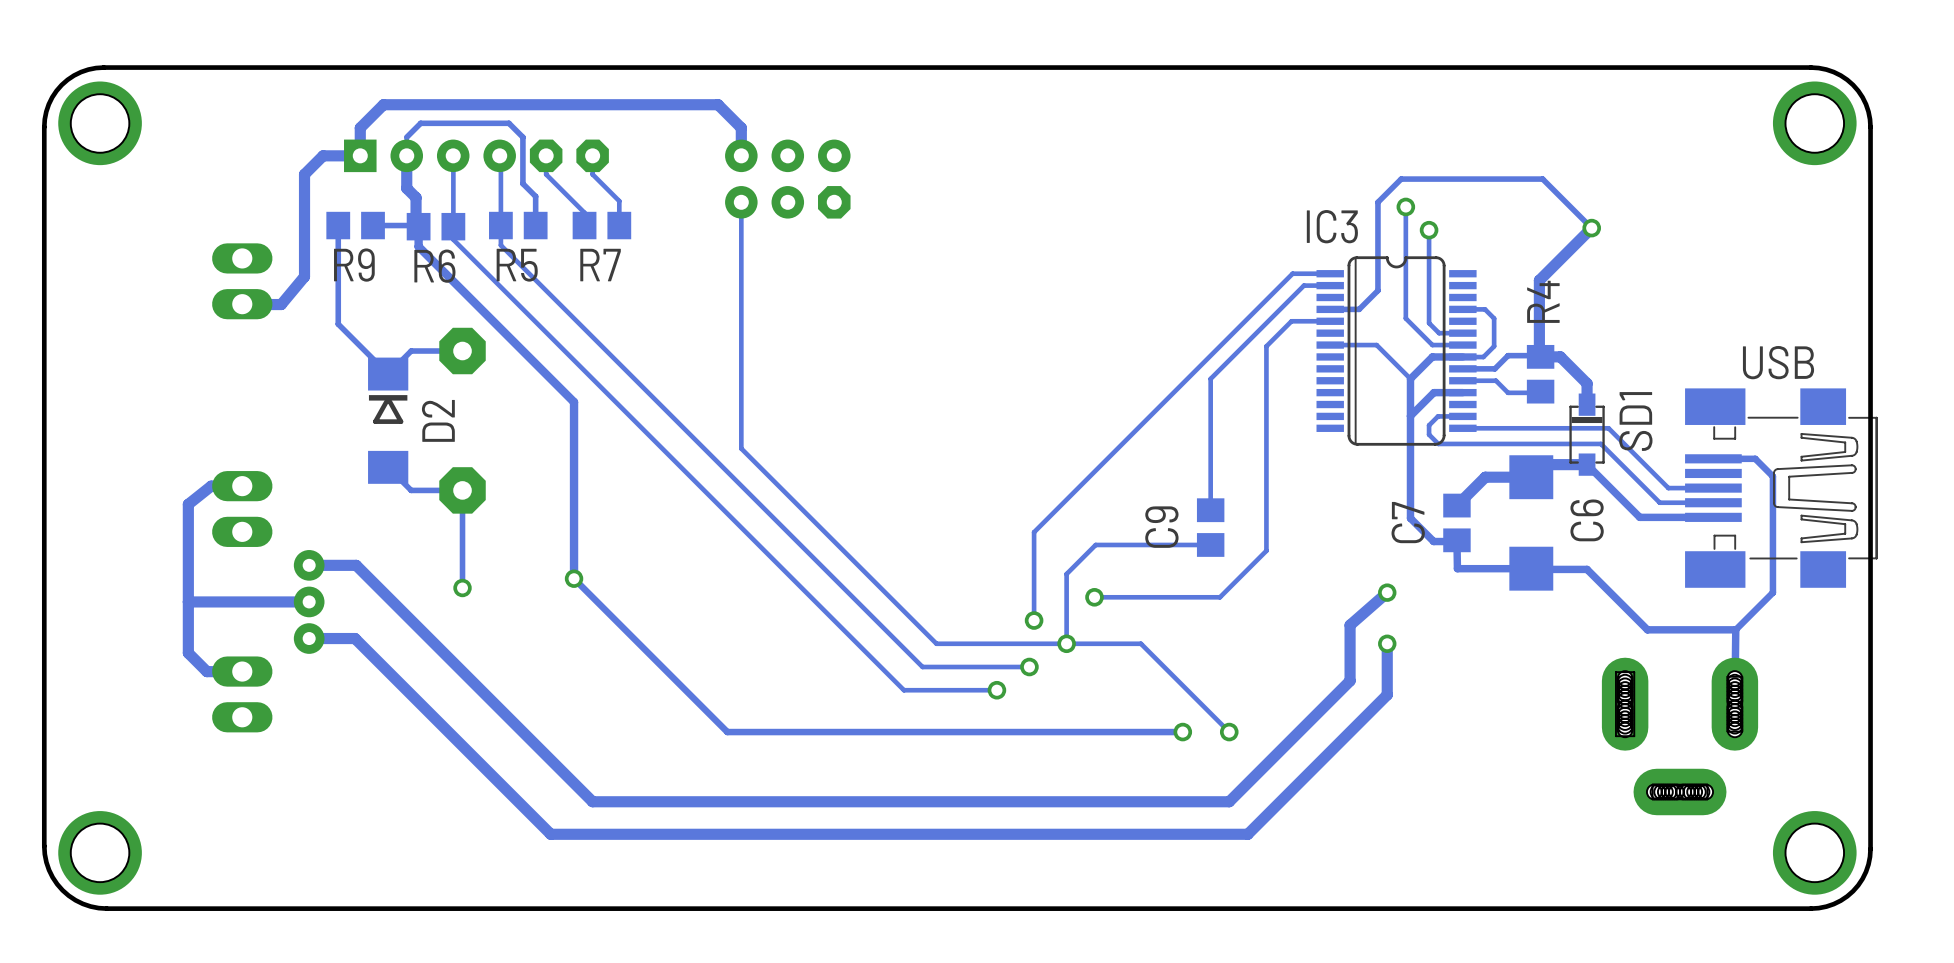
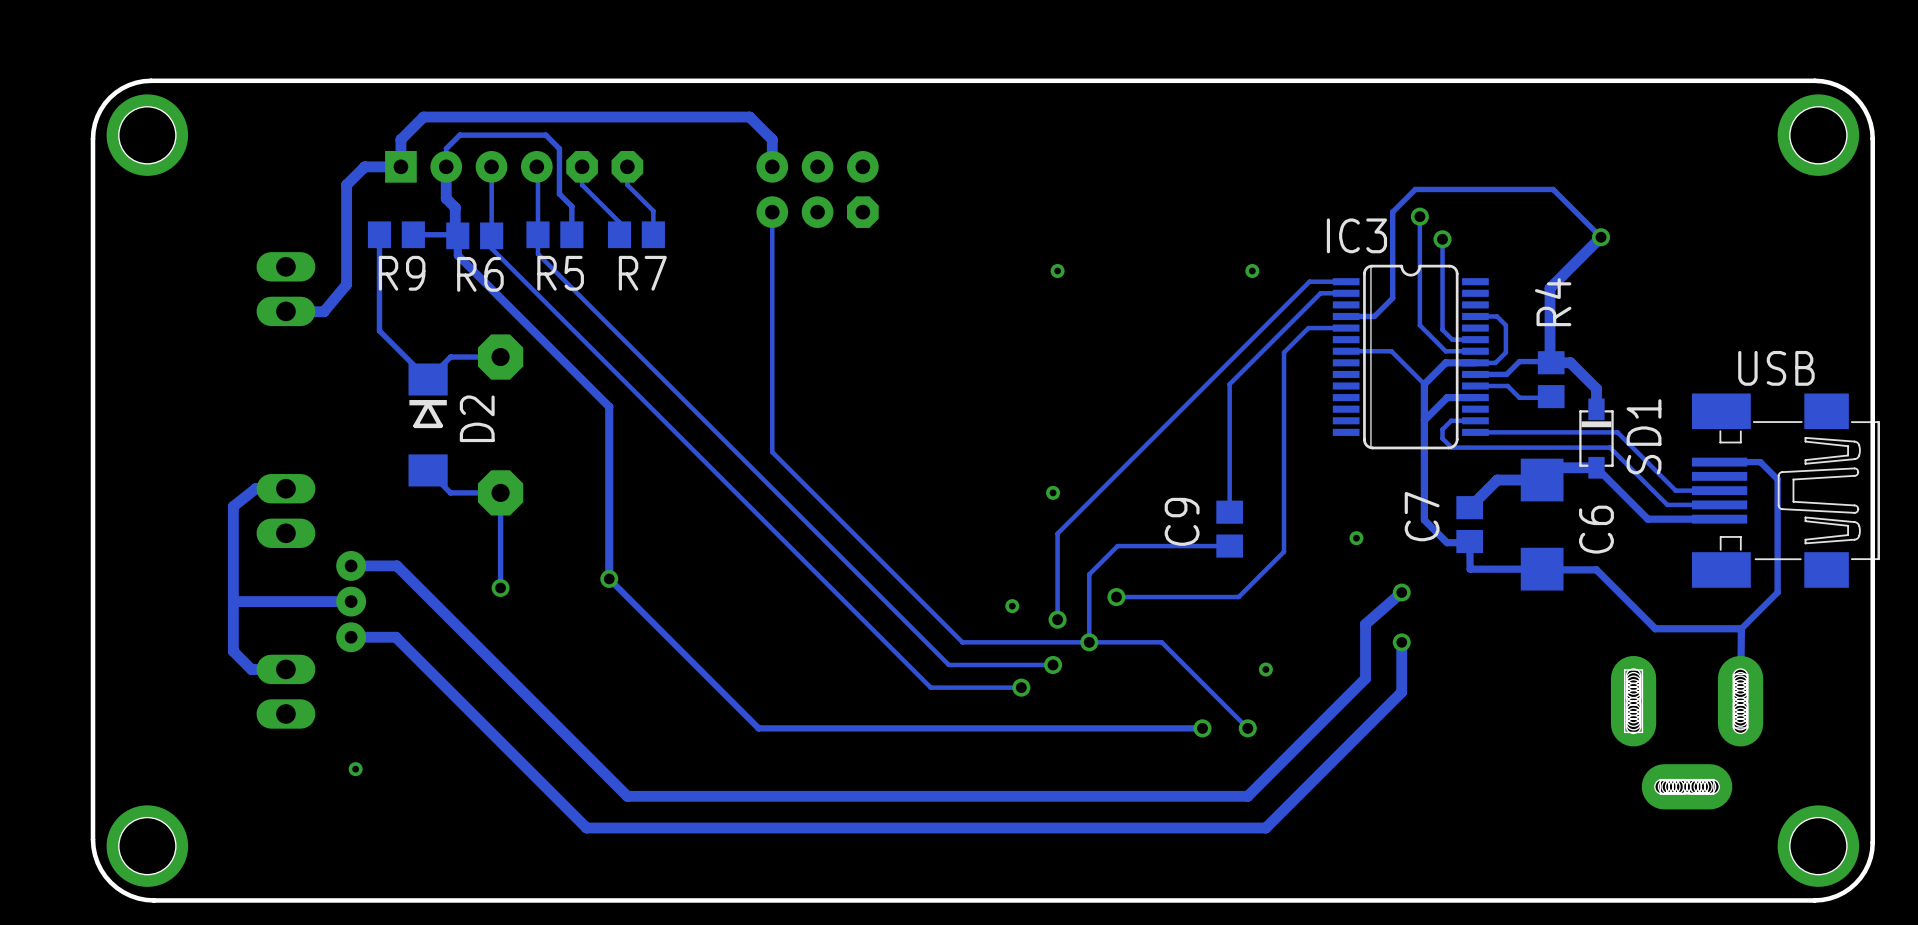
via: none -> (1057, 270)
via: none -> (1252, 270)
via: none -> (1053, 492)
via: none -> (1356, 538)
via: none -> (1012, 606)
via: none -> (1265, 669)
via: none -> (355, 769)

